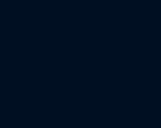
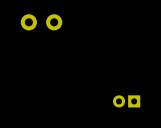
part: none -> (41, 22)
part: none -> (126, 101)

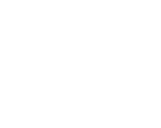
part: (41, 22) -> none
part: (126, 101) -> none

